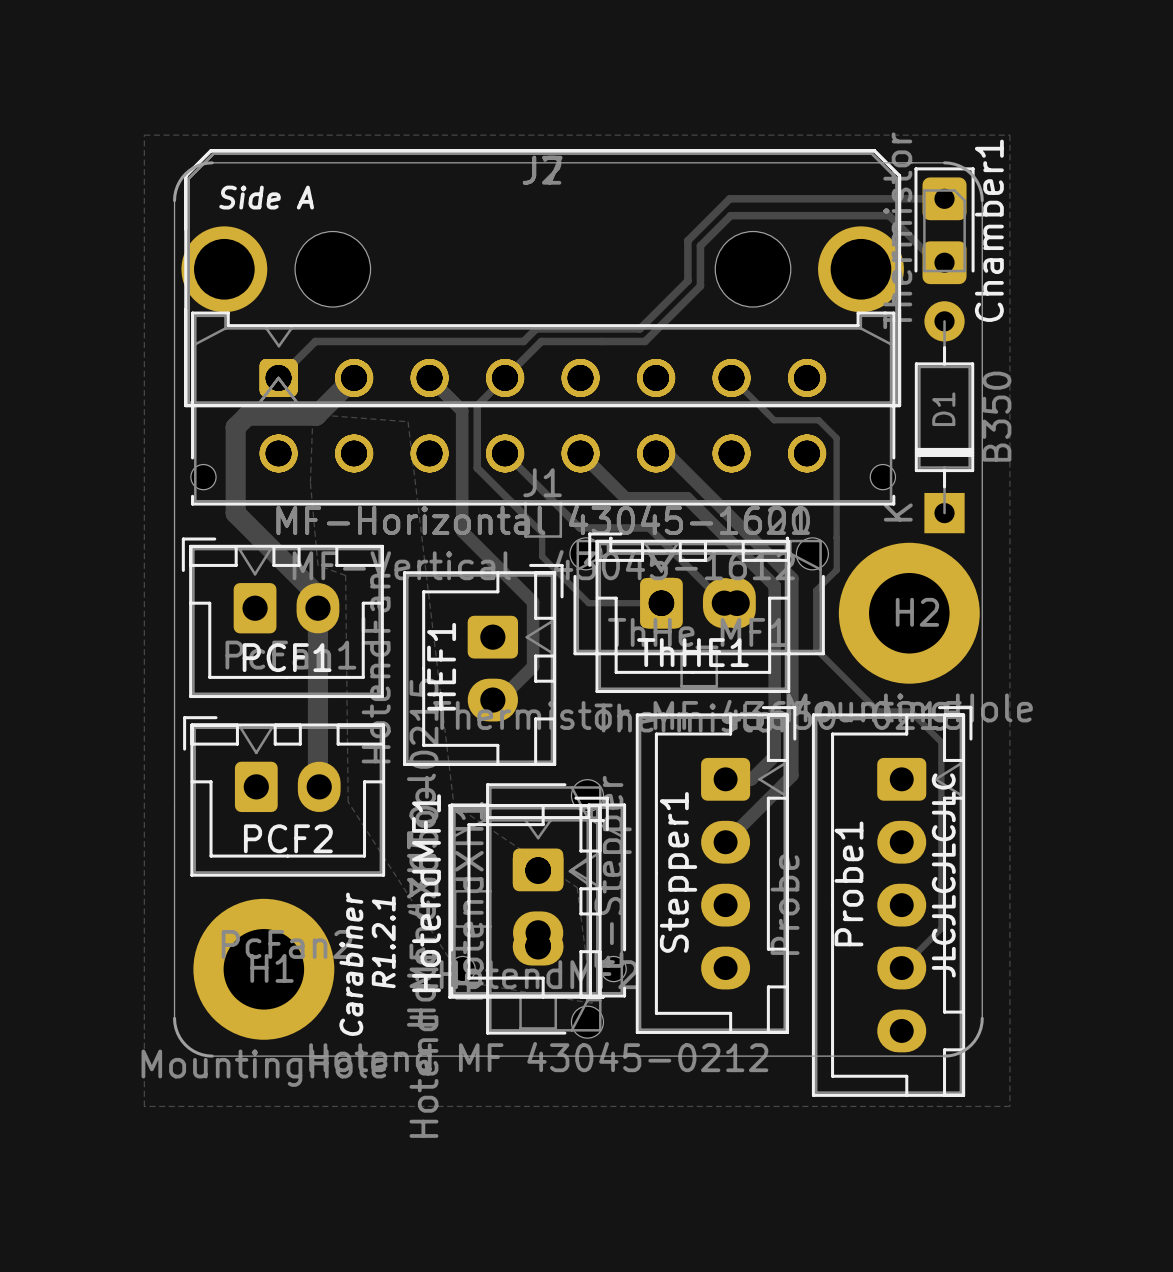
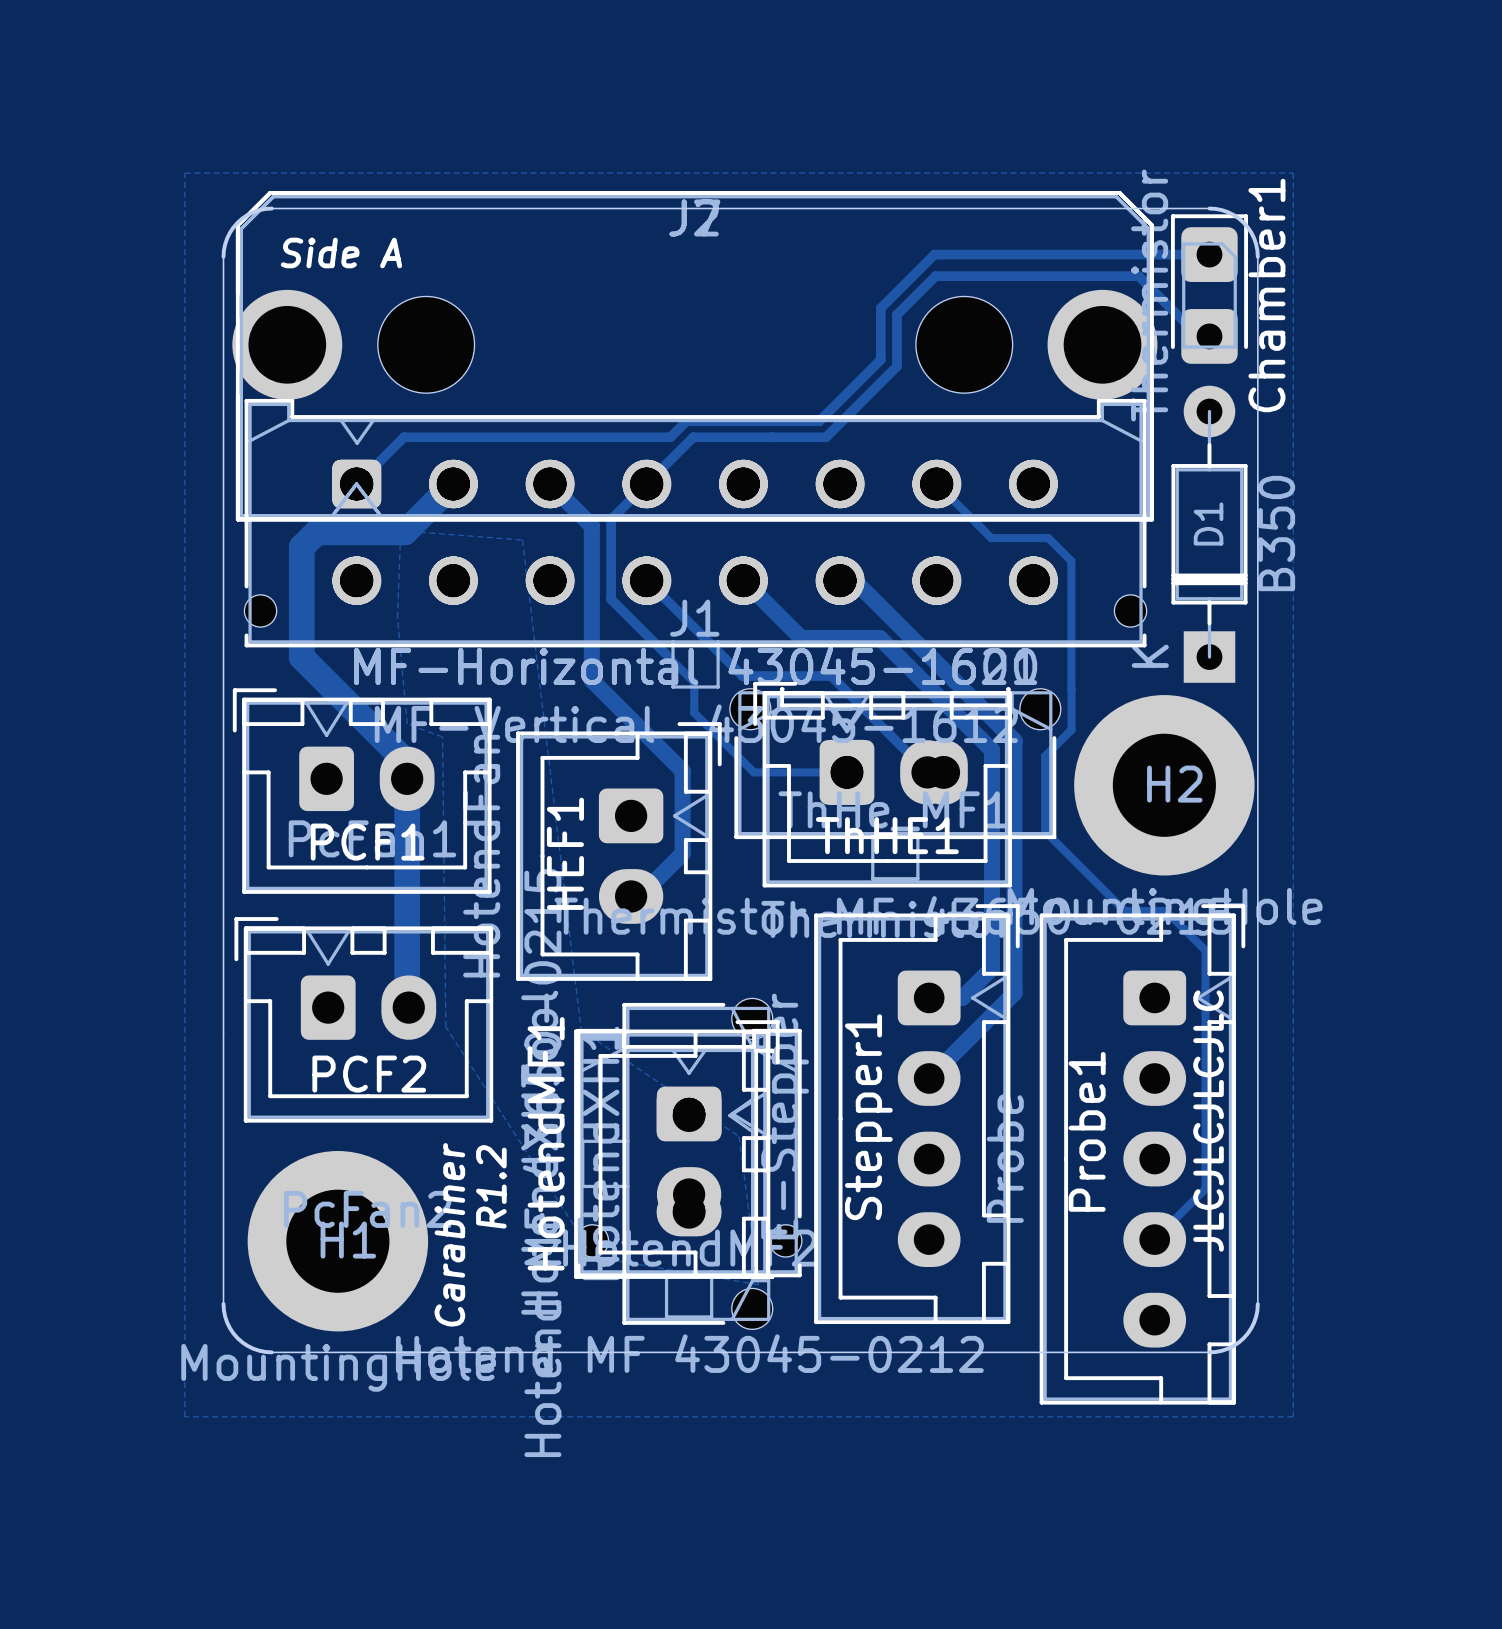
text: R1.2.1 (383, 942) -> R1.2 (491, 1186)

